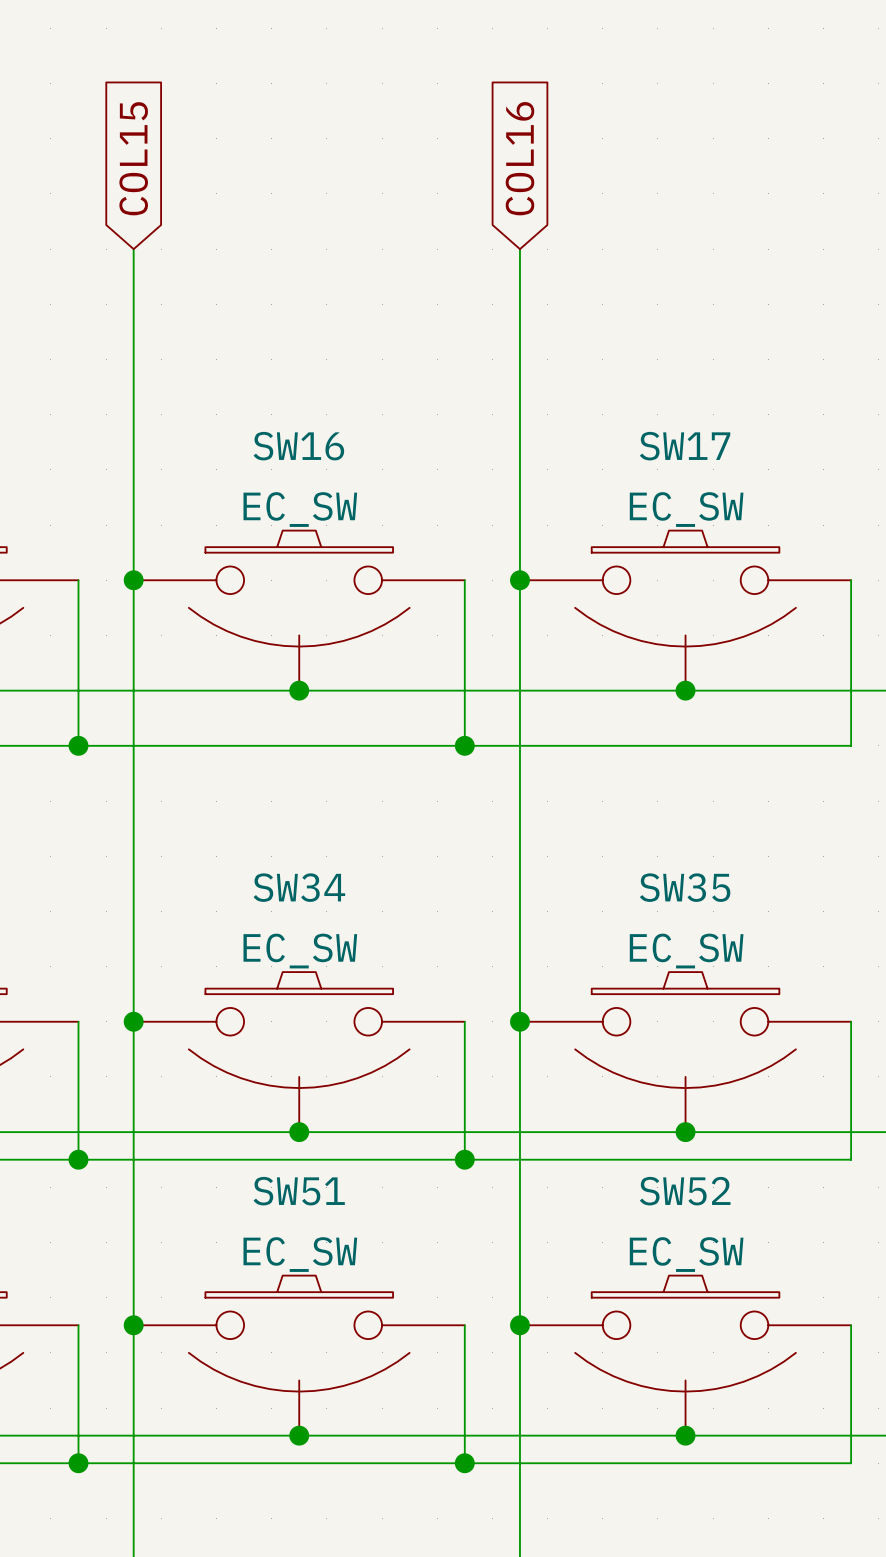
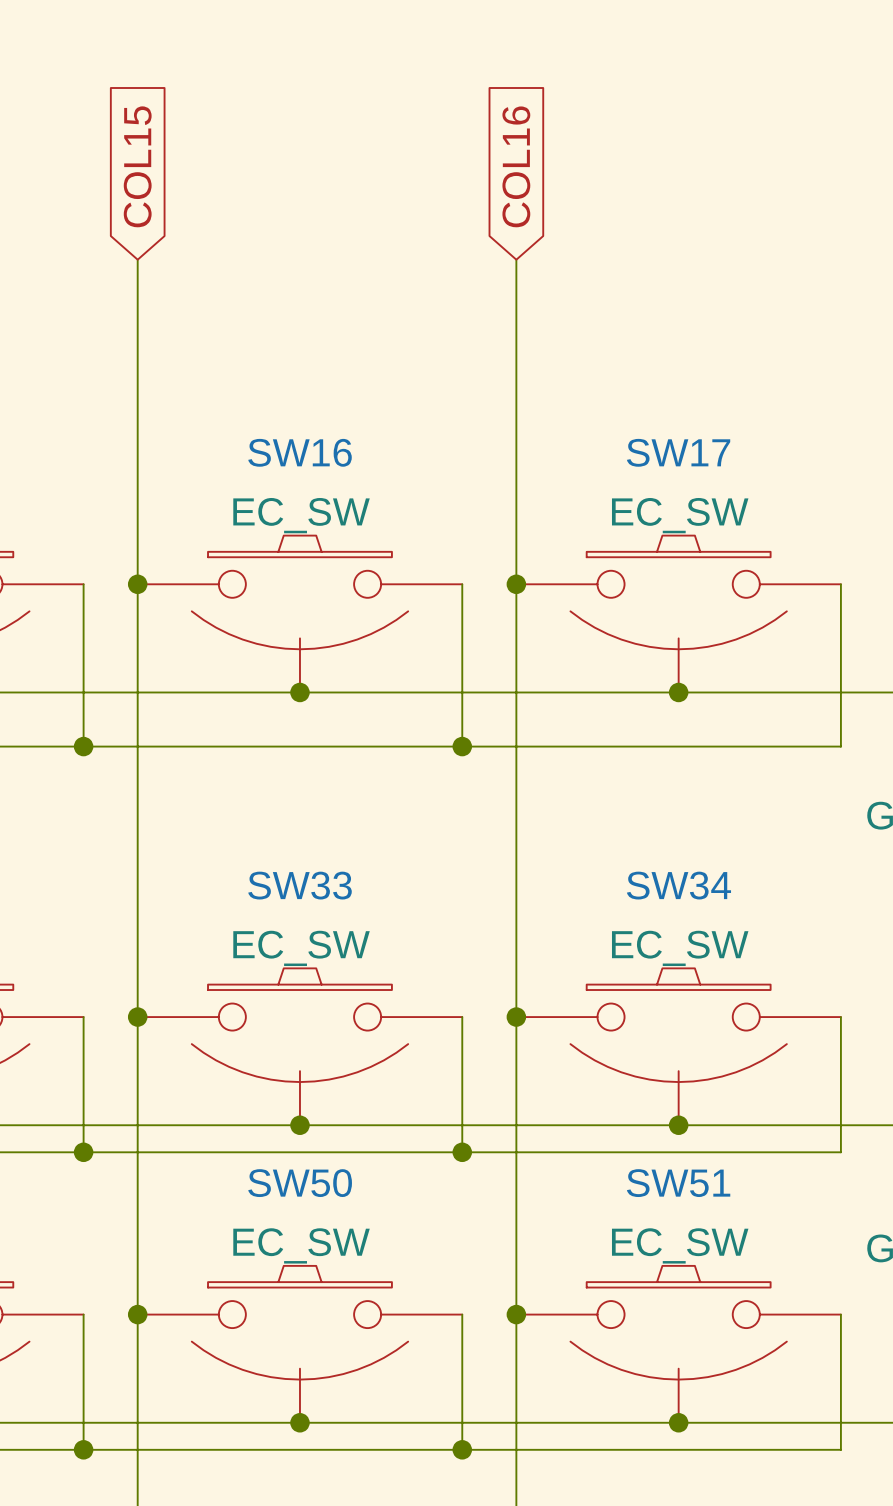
SW34 name: SW34 (299, 887) -> SW33 (300, 885)
SW35 name: SW35 (685, 887) -> SW34 (678, 885)
SW51 name: SW51 (299, 1191) -> SW50 (300, 1183)
SW52 name: SW52 (685, 1191) -> SW51 (678, 1183)

